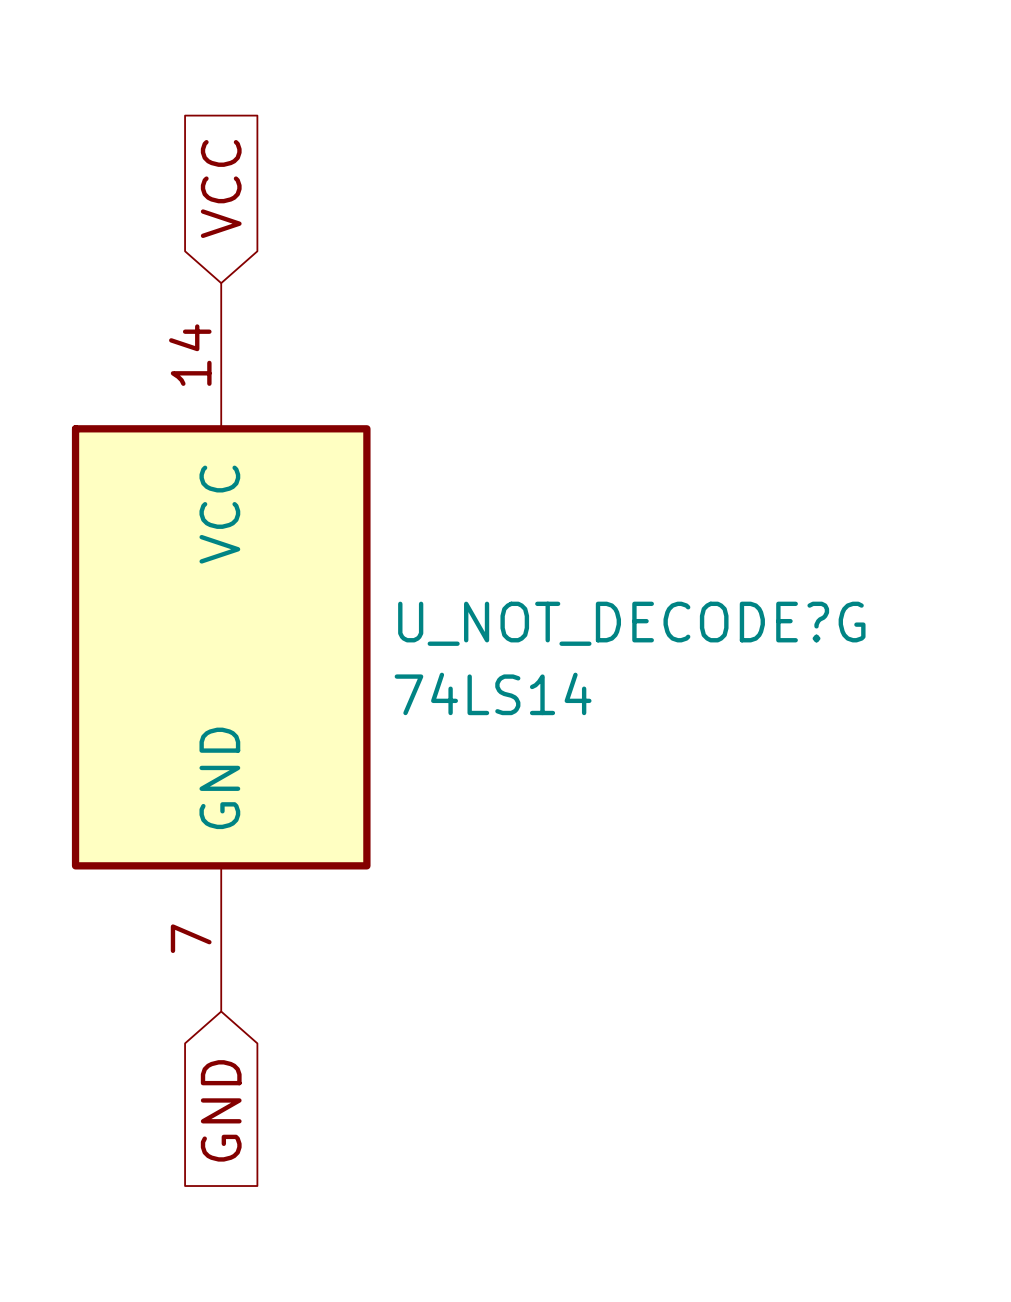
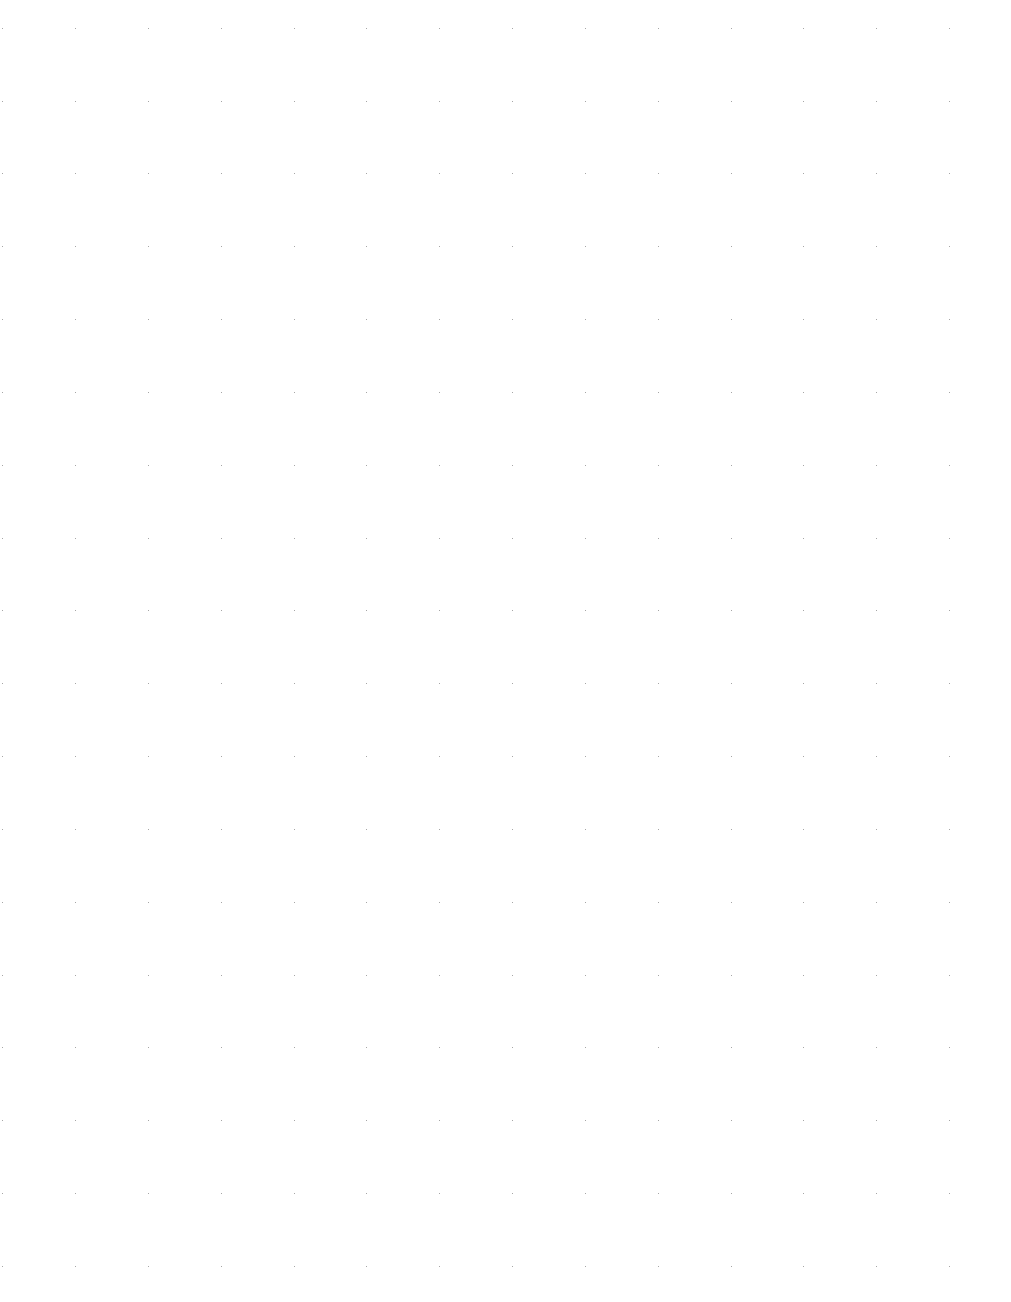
global label: VCC (221, 188) -> none
U_NOT_DECODE?G: 74LS14 (221, 647) -> none
global label: GND (221, 1110) -> none

